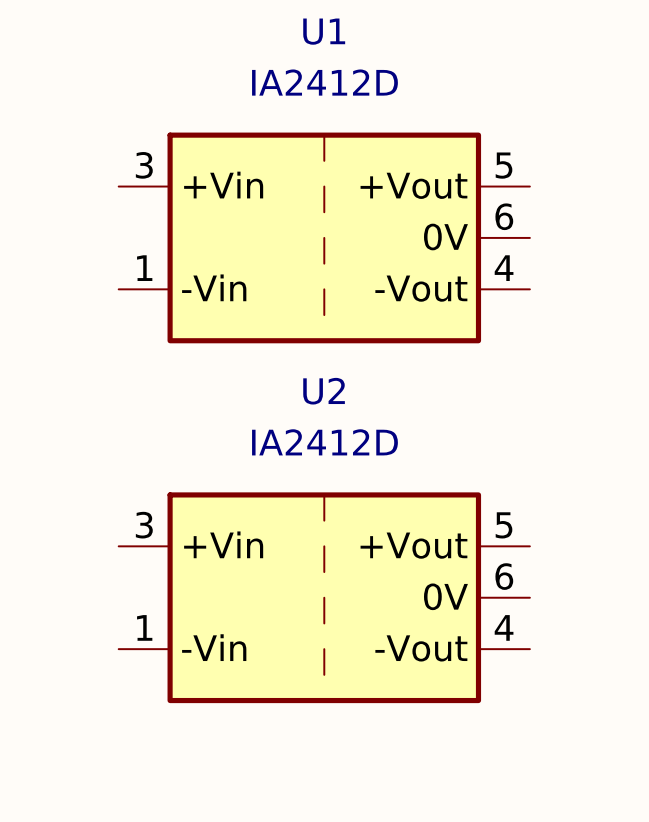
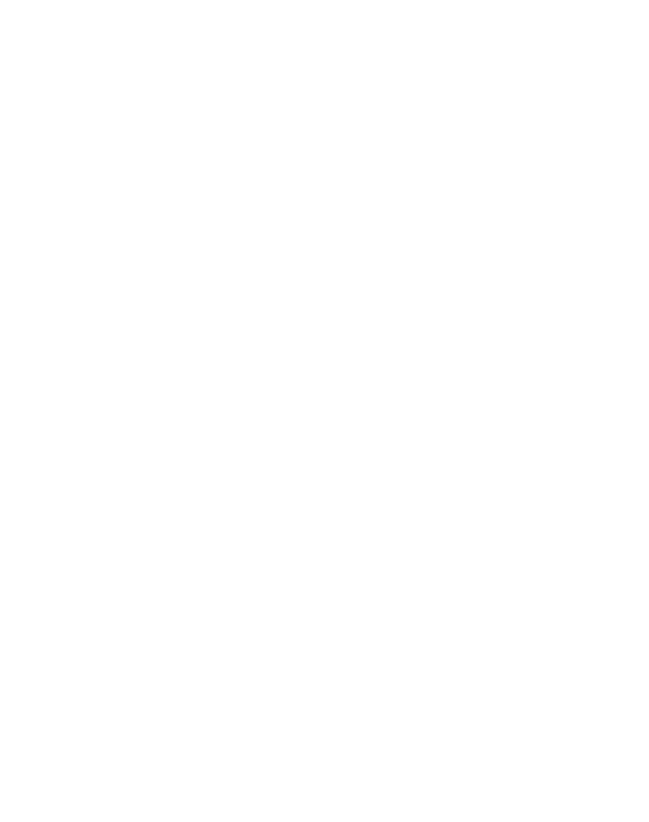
U1: IA2412D (324, 237) -> none
U2: IA2412D (324, 597) -> none

